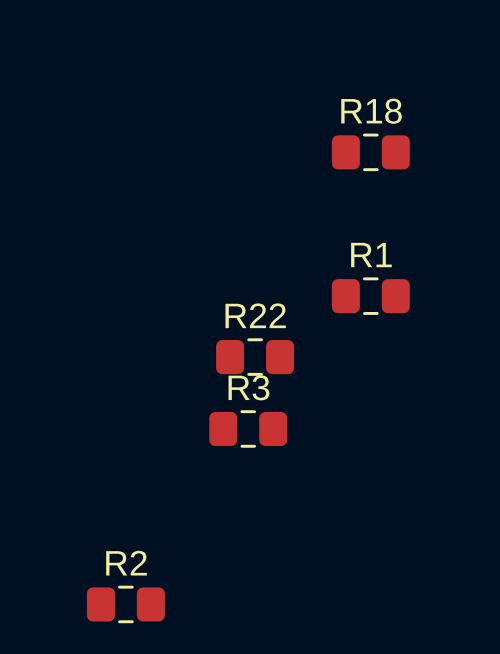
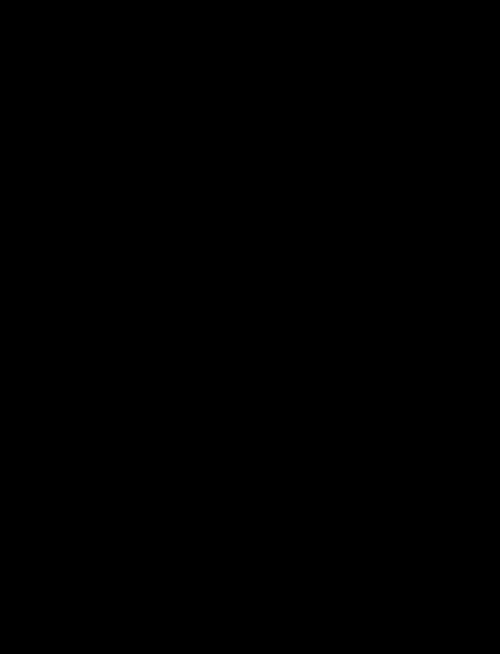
R18: (370, 152) -> none
R1: (370, 296) -> none
R22: (255, 357) -> none
R3: (248, 428) -> none
R2: (125, 604) -> none

